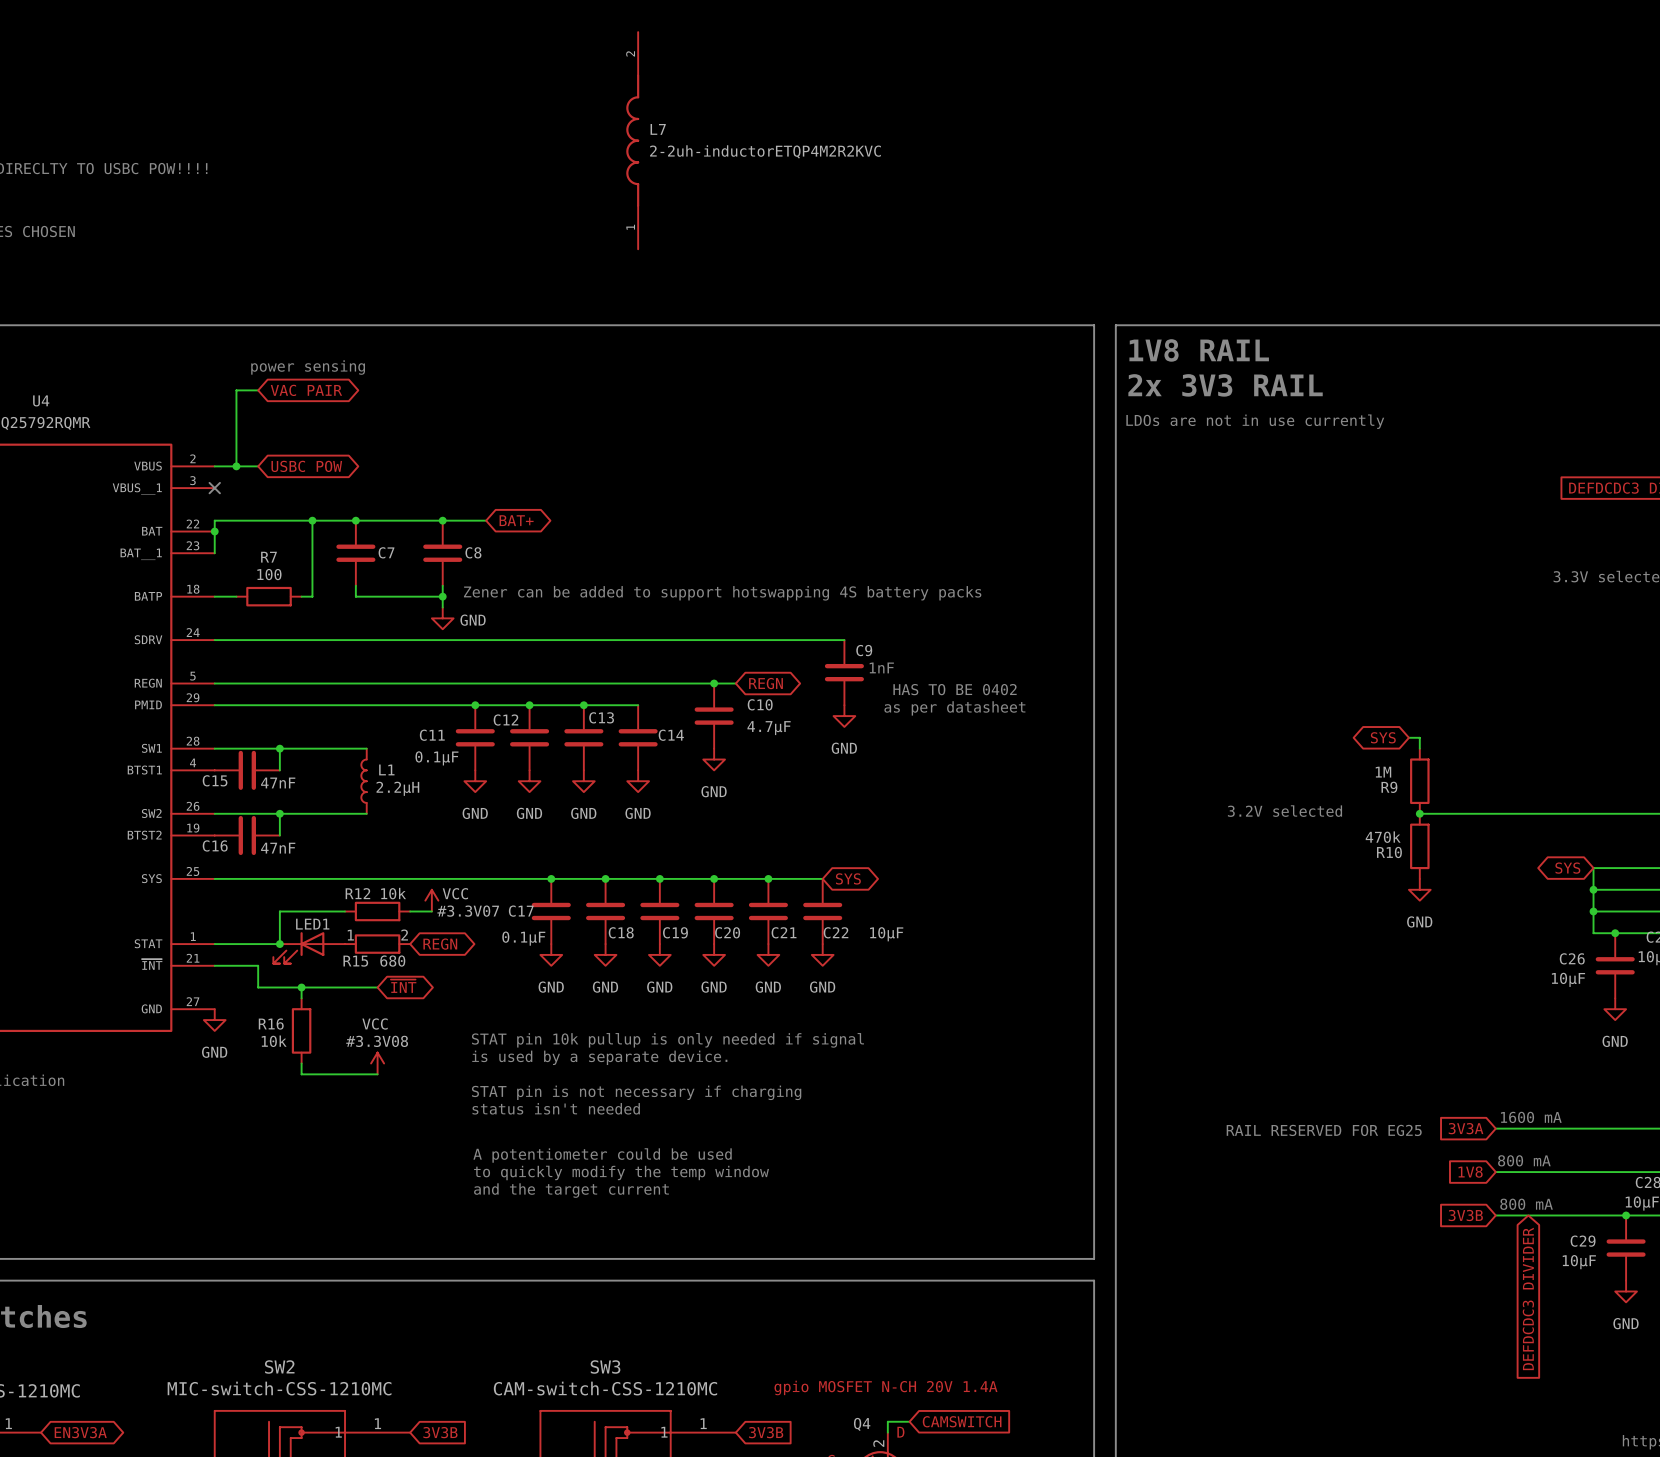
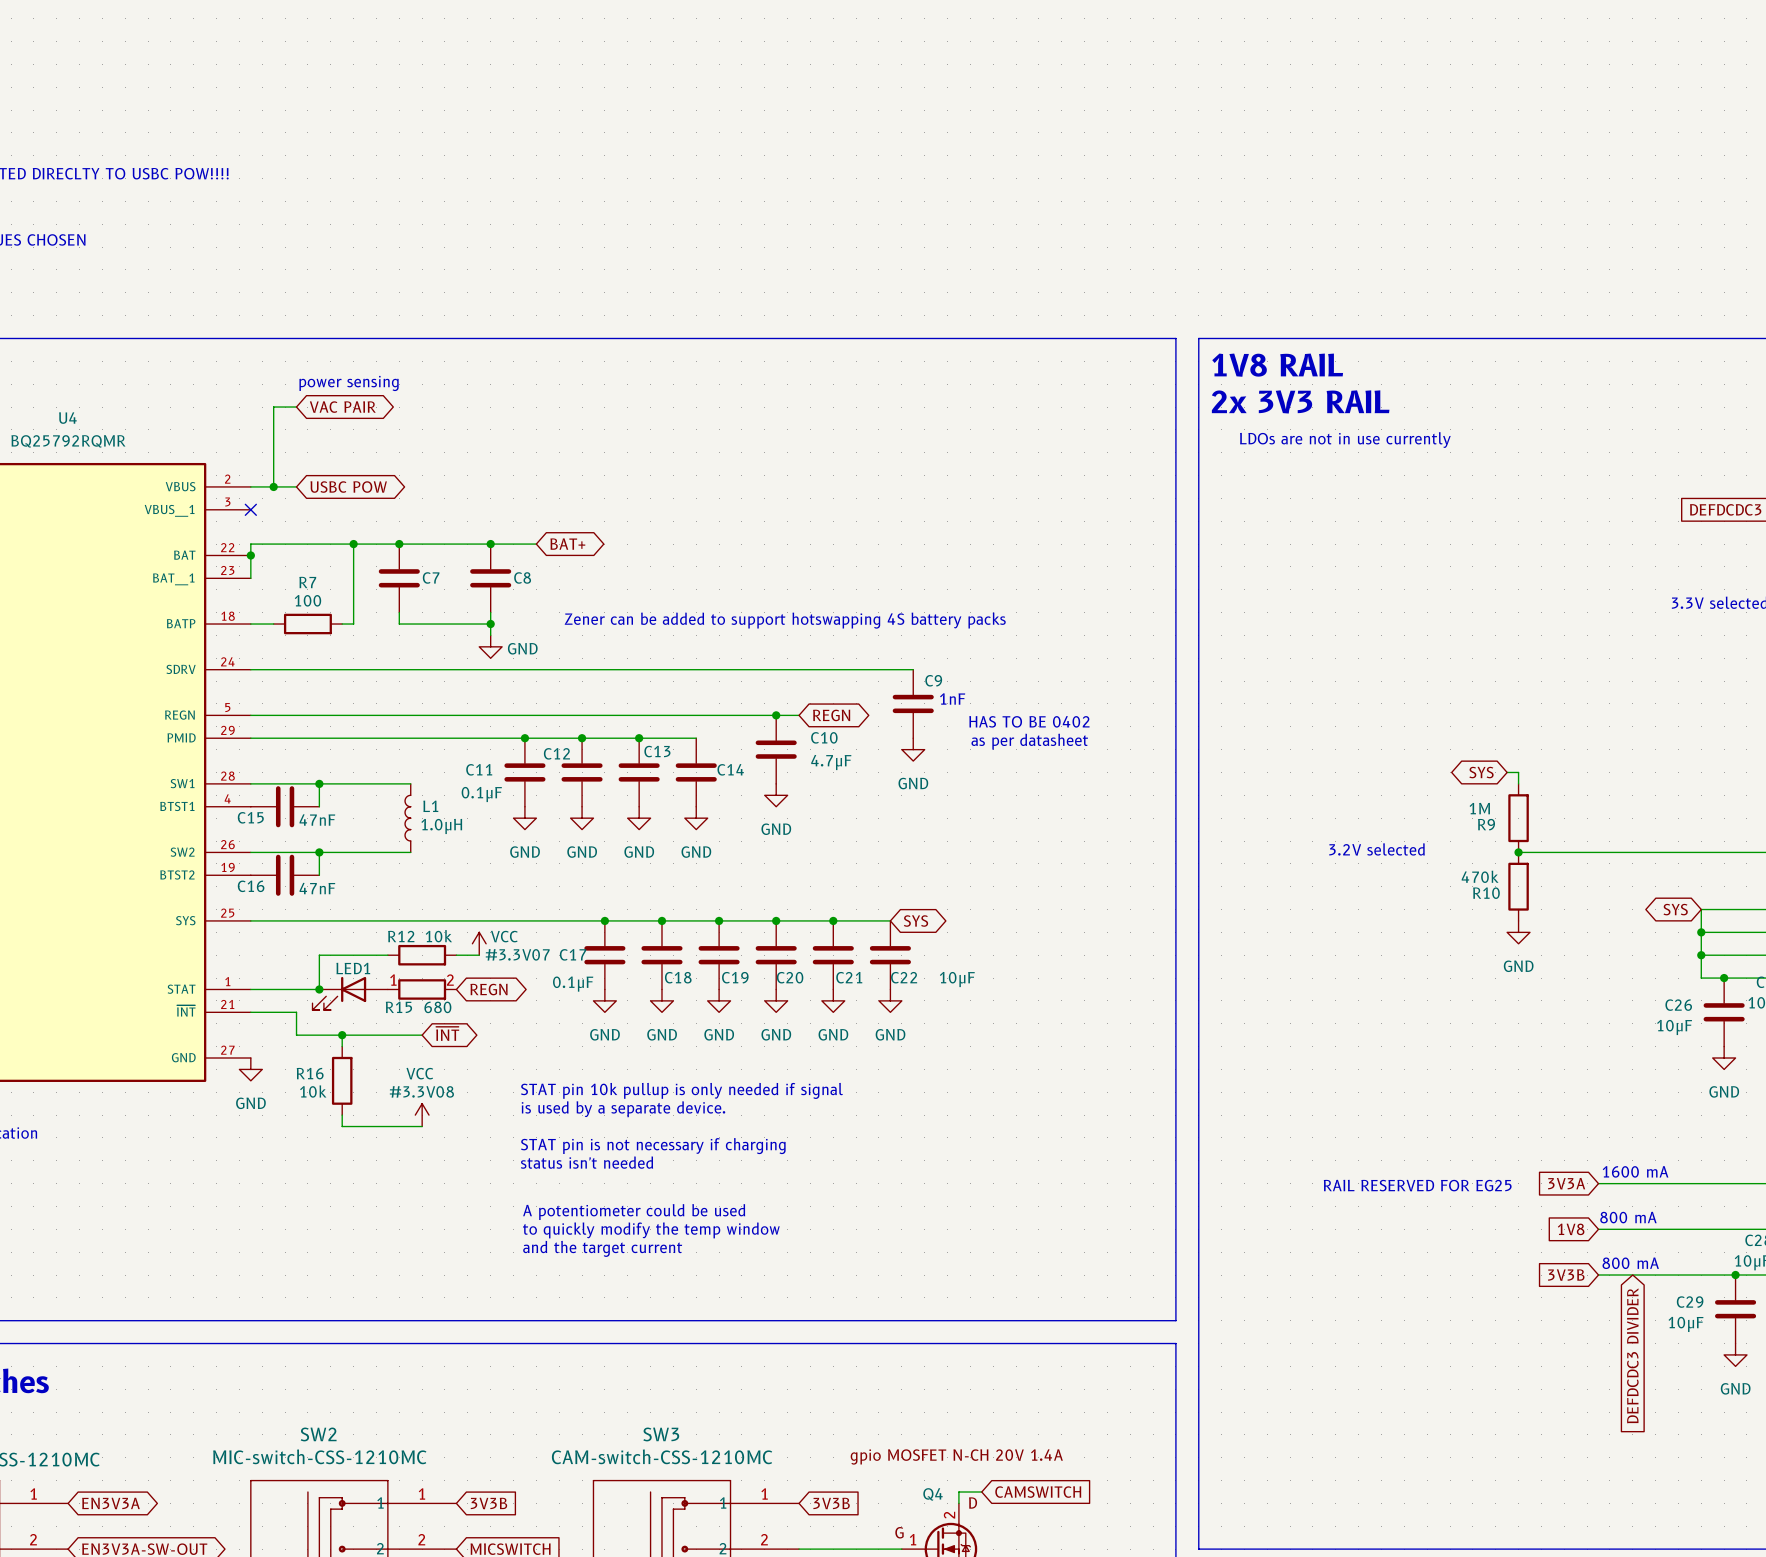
L7: 2-2uh-inductorETQP4M2R2KVC (632, 140) -> none
L1 value: 2.2µH (397, 788) -> 1.0μH (441, 826)

